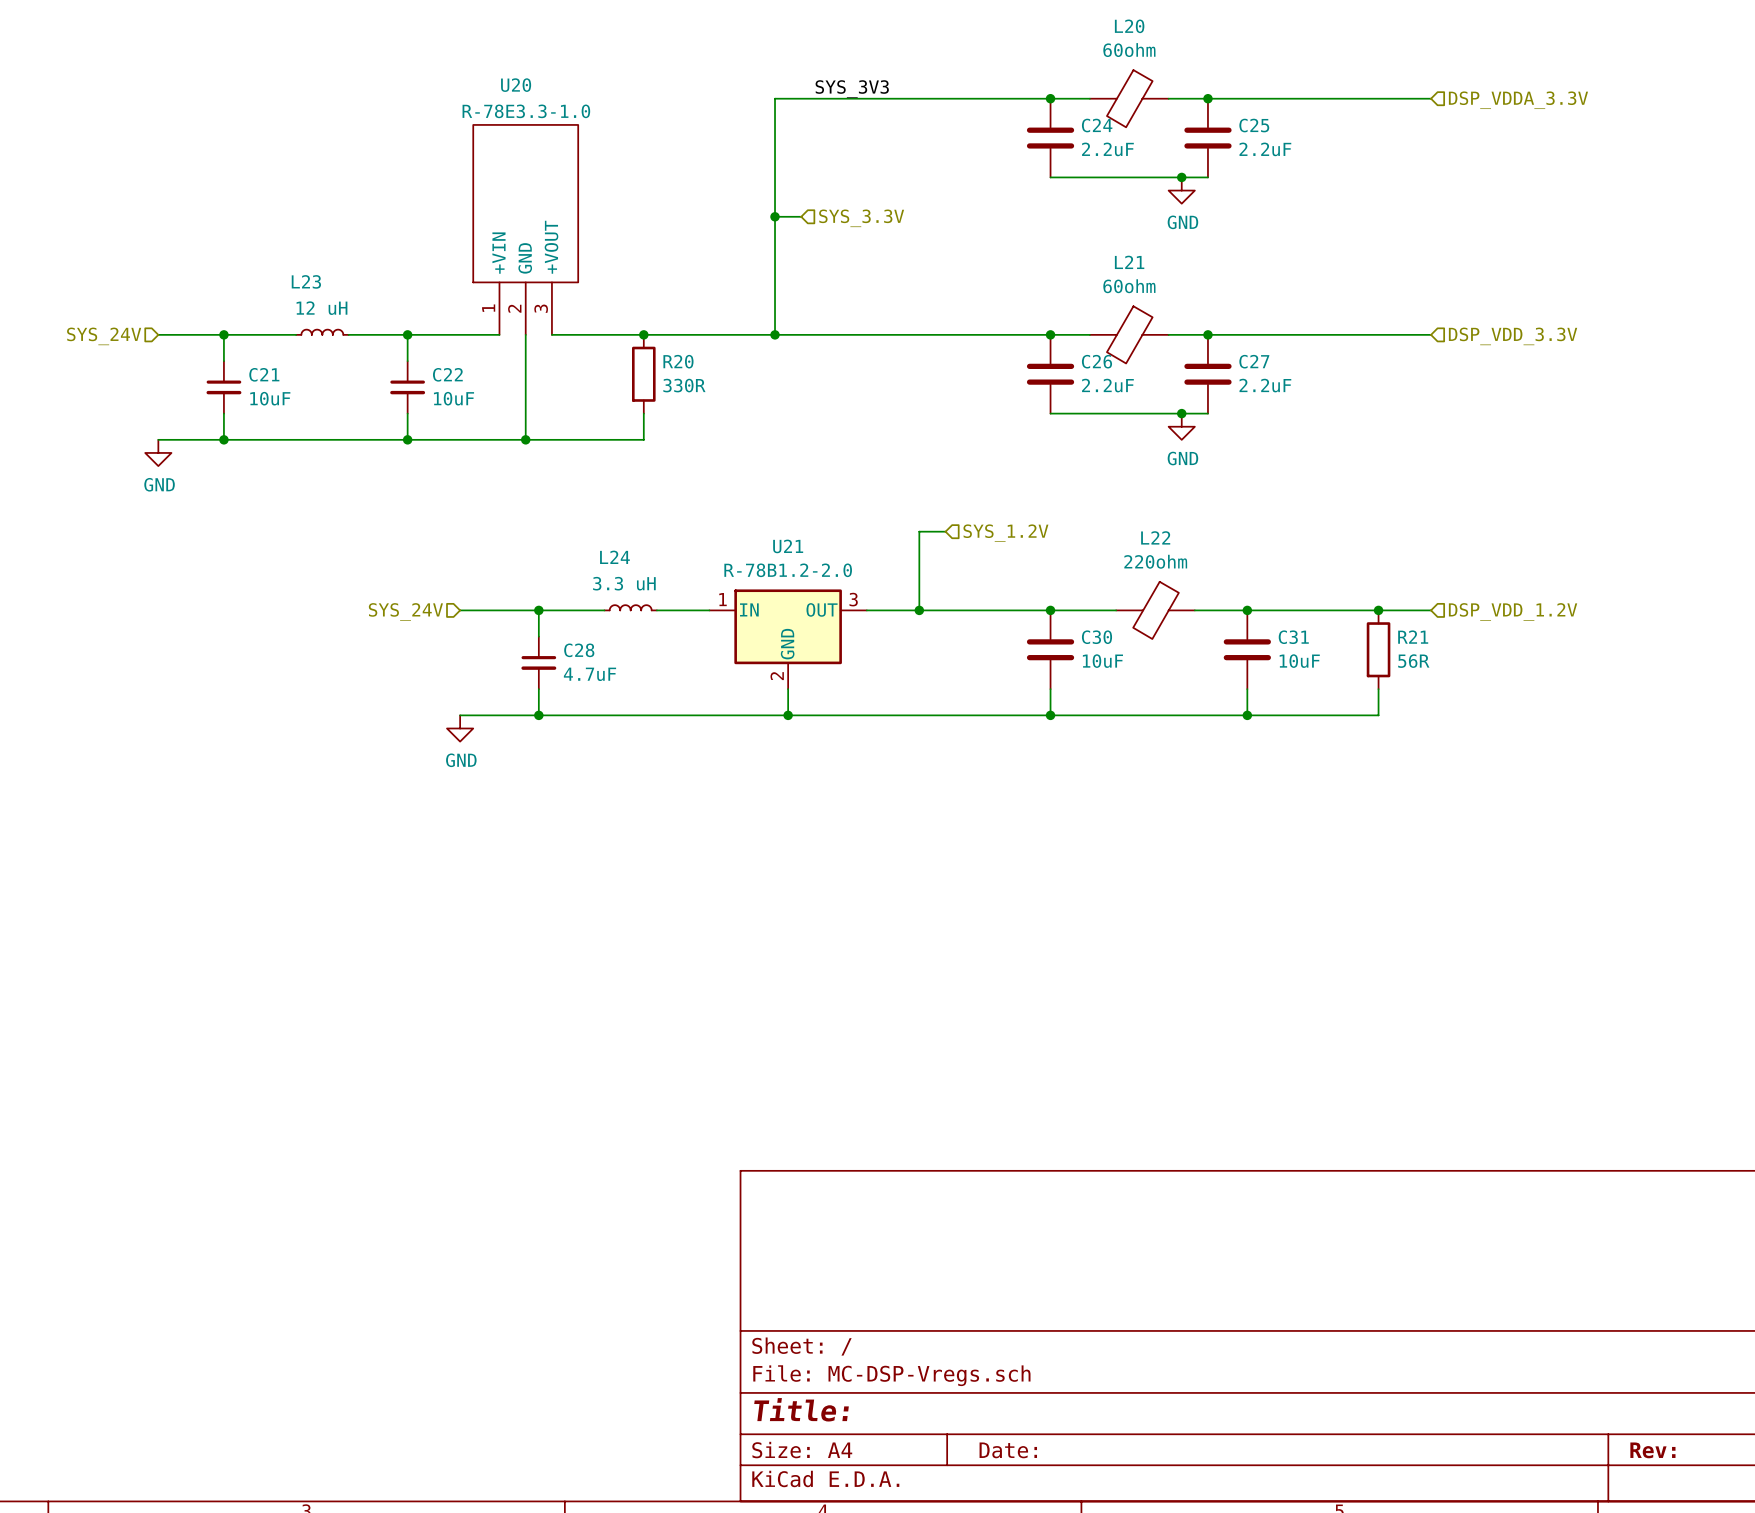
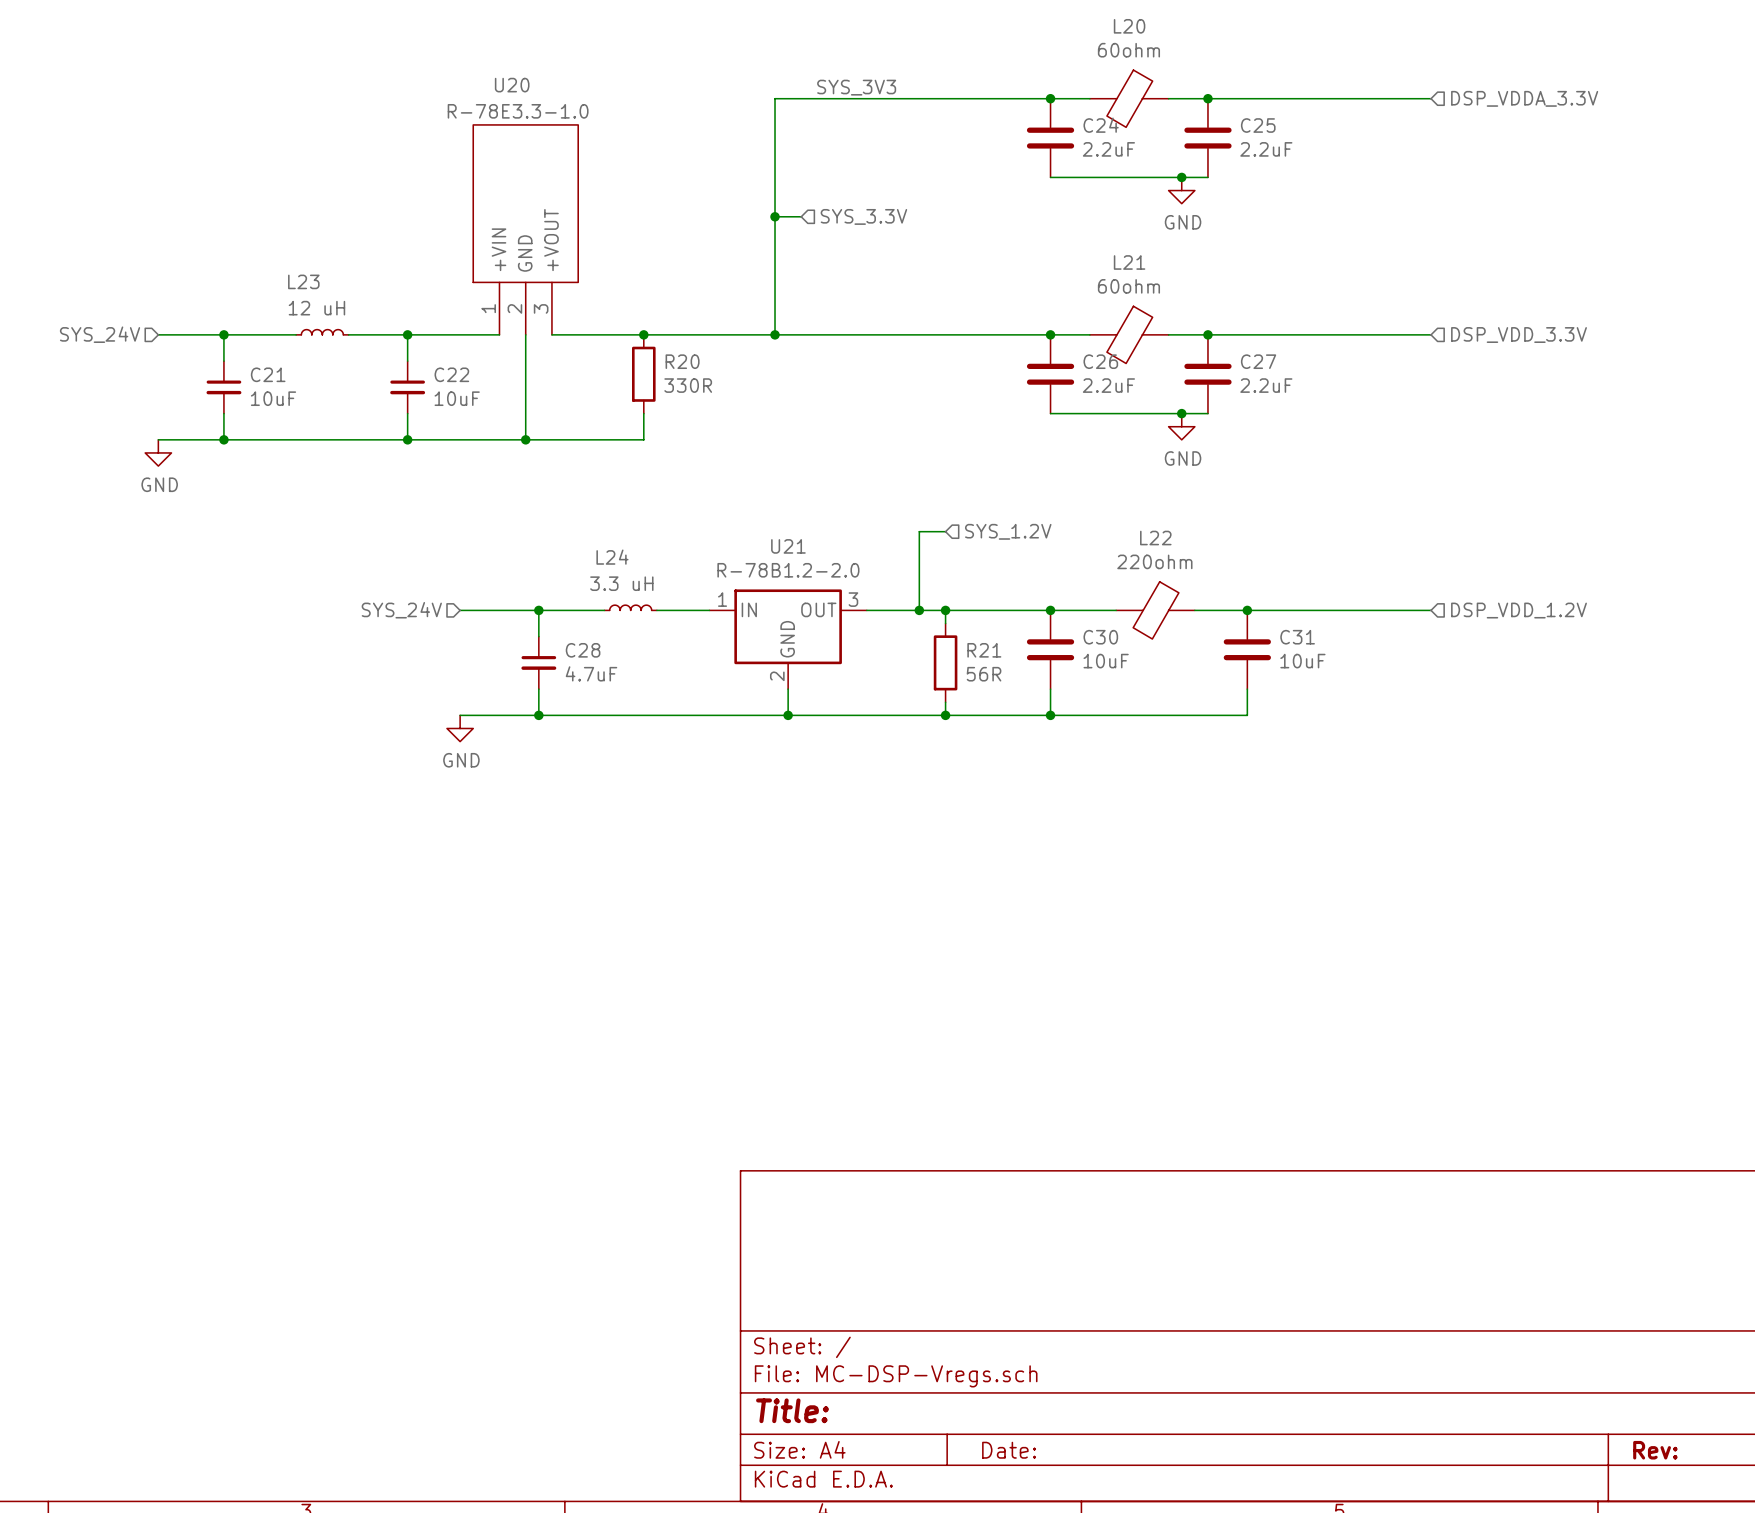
wire: none -> (945, 610) (945, 623)
junction: none -> (945, 610)
junction: (1378, 610) -> none
R21 position: (1378, 649) -> (945, 662)
wire: (1378, 689) (1378, 715) (1247, 715) -> none
wire: none -> (945, 702) (945, 715)
junction: none -> (945, 715)
junction: (1247, 715) -> none

